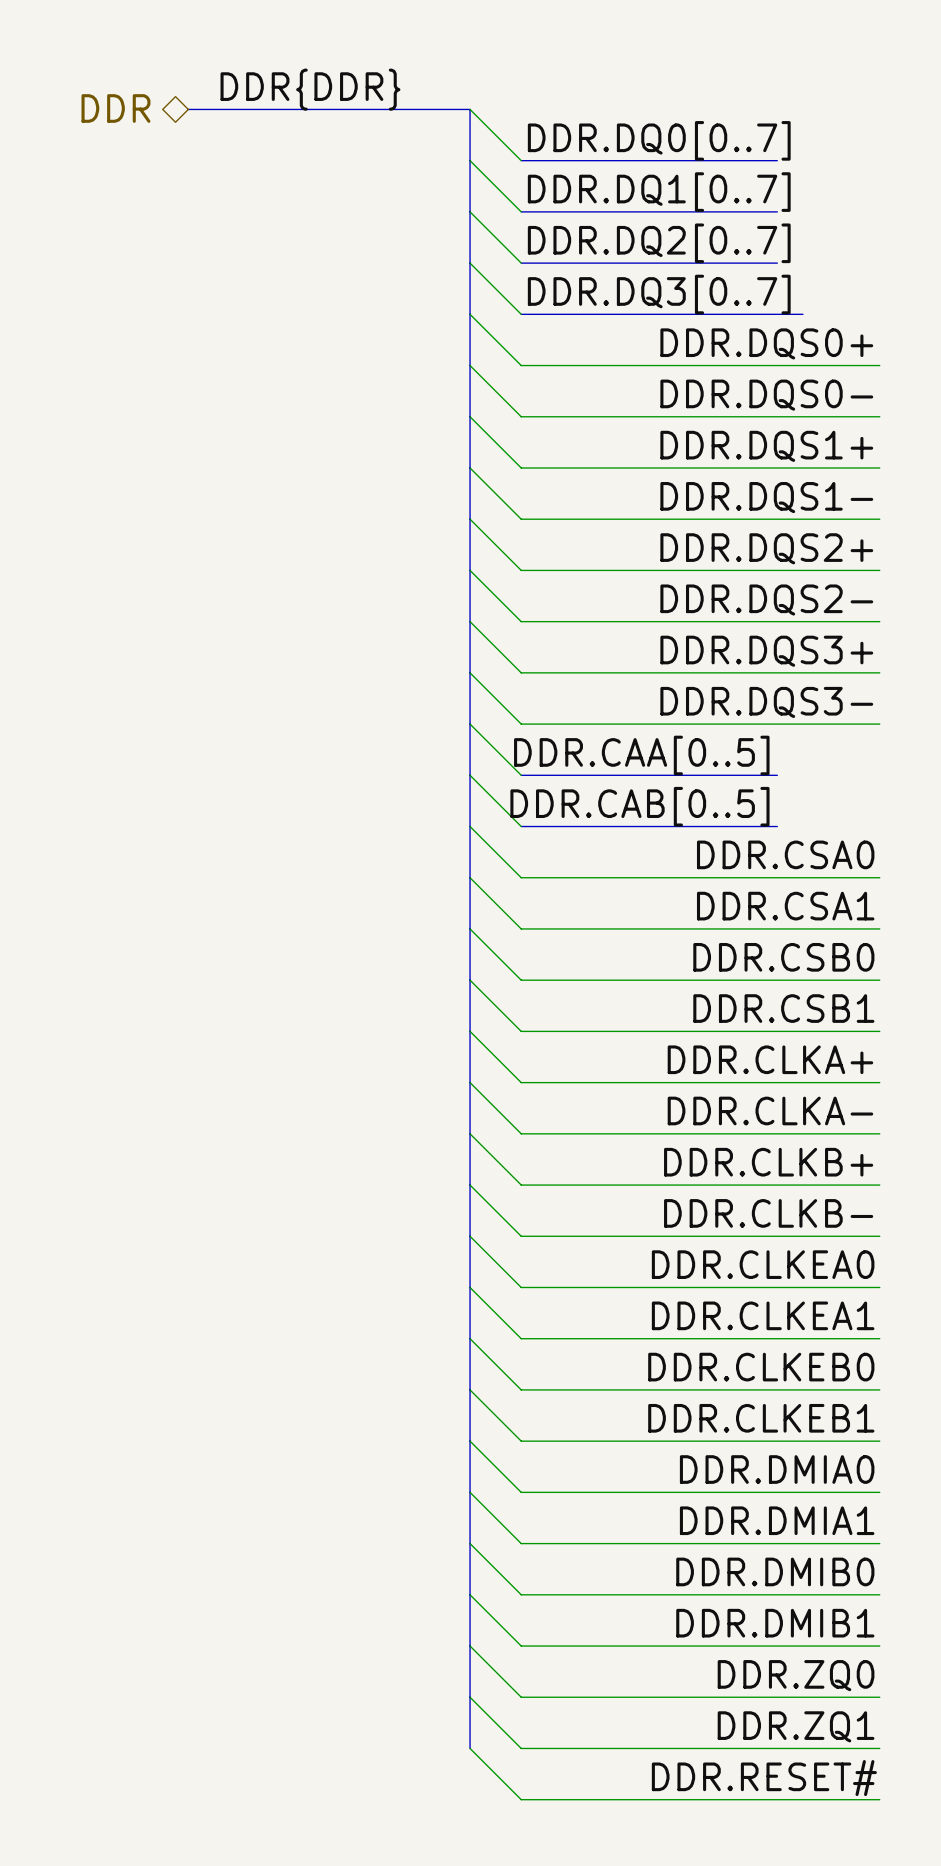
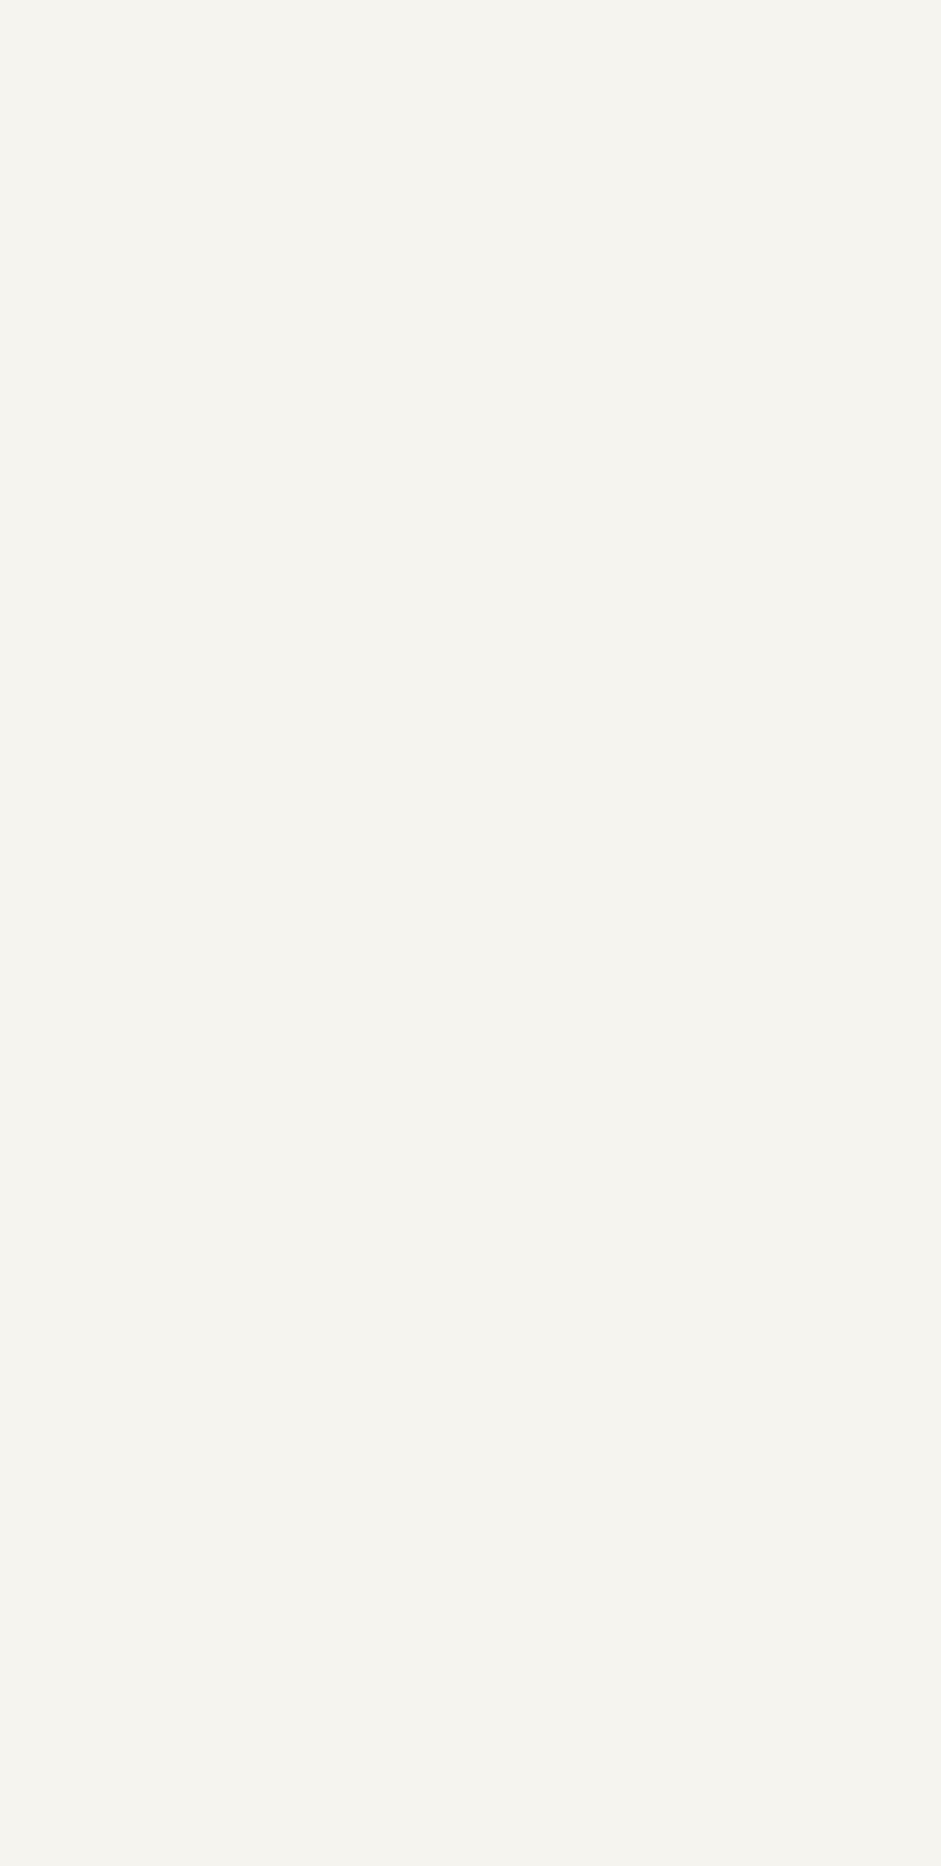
label: DDR{DDR} (310, 89) -> none
hierarchical label: DDR (115, 108) -> none
bus: (188, 109) (470, 109) (470, 1748) -> none
wire: (470, 109) (521, 160) -> none
label: DDR.DQ0[0..7] (659, 140) -> none
wire: (470, 160) (521, 211) -> none
bus: (521, 160) (777, 160) -> none
label: DDR.DQ1[0..7] (659, 192) -> none
wire: (470, 211) (521, 263) -> none
bus: (521, 211) (777, 211) -> none
label: DDR.DQ2[0..7] (659, 243) -> none
wire: (470, 263) (521, 314) -> none
bus: (521, 263) (777, 263) -> none
label: DDR.DQ3[0..7] (659, 294) -> none
wire: (470, 314) (521, 365) (879, 365) -> none
bus: (521, 314) (802, 314) -> none
label: DDR.DQS0+ (766, 343) -> none
wire: (470, 365) (521, 416) (879, 416) -> none
label: DDR.DQS0- (766, 395) -> none
wire: (470, 416) (521, 467) (879, 467) -> none
label: DDR.DQS1+ (766, 446) -> none
wire: (470, 467) (521, 519) (879, 519) -> none
label: DDR.DQS1- (766, 497) -> none
wire: (470, 519) (521, 570) (879, 570) -> none
label: DDR.DQS2+ (766, 548) -> none
wire: (470, 570) (521, 621) (879, 621) -> none
label: DDR.DQS2- (766, 600) -> none
wire: (470, 621) (521, 672) (879, 672) -> none
label: DDR.DQS3+ (766, 651) -> none
wire: (470, 672) (521, 724) (879, 724) -> none
label: DDR.DQS3- (766, 702) -> none
wire: (470, 724) (521, 775) -> none
label: DDR.CAA[0..5] (641, 755) -> none
wire: (470, 775) (521, 826) -> none
bus: (521, 775) (777, 775) -> none
label: DDR.CAB[0..5] (639, 806) -> none
wire: (470, 826) (521, 877) (879, 877) -> none
bus: (521, 826) (777, 826) -> none
label: DDR.CSA0 (785, 854) -> none
wire: (470, 877) (521, 928) (879, 928) -> none
label: DDR.CSA1 (785, 906) -> none
wire: (470, 928) (521, 980) (879, 980) -> none
label: DDR.CSB0 (783, 957) -> none
wire: (470, 980) (521, 1031) (879, 1031) -> none
label: DDR.CSB1 (783, 1008) -> none
wire: (470, 1031) (521, 1082) (879, 1082) -> none
label: DDR.CLKA+ (770, 1059) -> none
wire: (470, 1082) (521, 1133) (879, 1133) -> none
label: DDR.CLKA- (770, 1110) -> none
wire: (470, 1133) (521, 1185) (879, 1185) -> none
label: DDR.CLKB+ (768, 1162) -> none
wire: (470, 1185) (521, 1236) (879, 1236) -> none
label: DDR.CLKB- (768, 1213) -> none
wire: (470, 1236) (521, 1287) (879, 1287) -> none
label: DDR.CLKEA0 (763, 1264) -> none
wire: (470, 1287) (521, 1338) (879, 1338) -> none
label: DDR.CLKEA1 (763, 1315) -> none
wire: (470, 1338) (521, 1389) (879, 1389) -> none
label: DDR.CLKEB0 (761, 1367) -> none
wire: (470, 1389) (521, 1441) (879, 1441) -> none
label: DDR.CLKEB1 (761, 1418) -> none
wire: (470, 1441) (521, 1492) (879, 1492) -> none
label: DDR.DMIA0 (777, 1469) -> none
wire: (470, 1492) (521, 1543) (879, 1543) -> none
label: DDR.DMIA1 (777, 1520) -> none
wire: (470, 1543) (521, 1594) (879, 1594) -> none
label: DDR.DMIB0 (775, 1571) -> none
wire: (470, 1594) (521, 1646) (879, 1646) -> none
label: DDR.DMIB1 (775, 1623) -> none
wire: (470, 1646) (521, 1697) (879, 1697) -> none
label: DDR.ZQ0 (796, 1675) -> none
wire: (470, 1697) (521, 1748) (879, 1748) -> none
label: DDR.ZQ1 (796, 1726) -> none
wire: (470, 1748) (521, 1799) (879, 1799) -> none
label: DDR.RESET# (764, 1778) -> none

